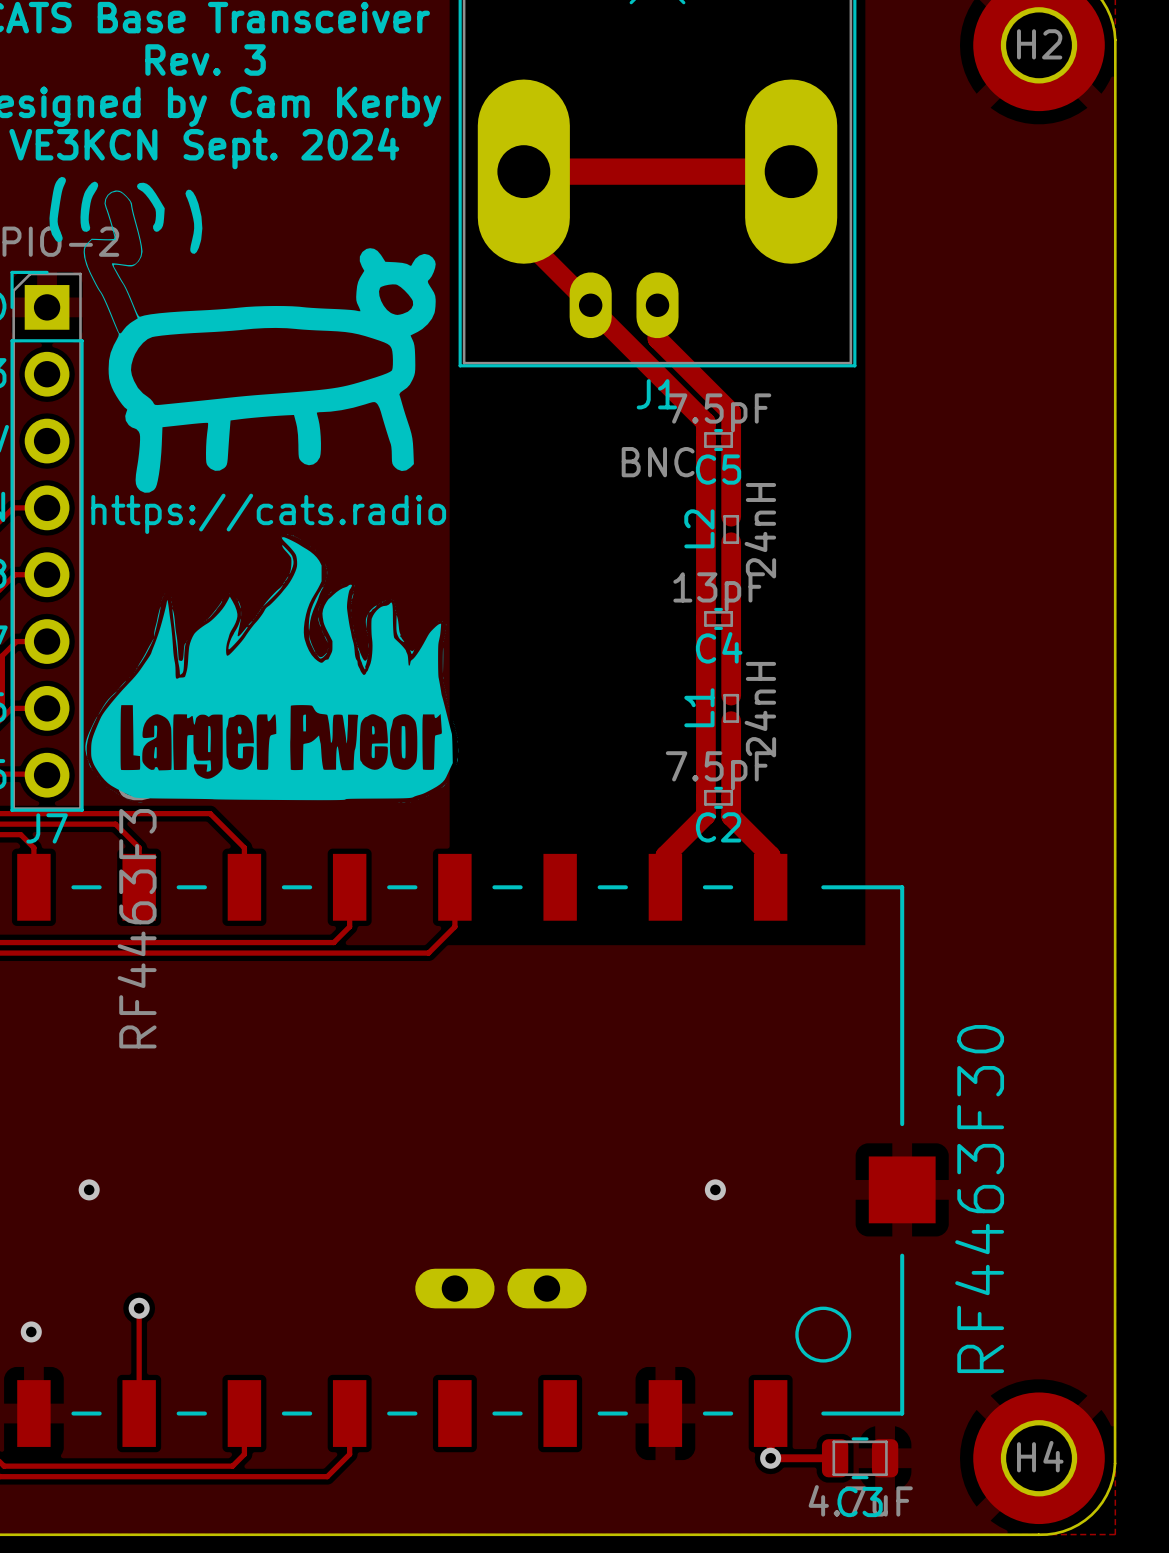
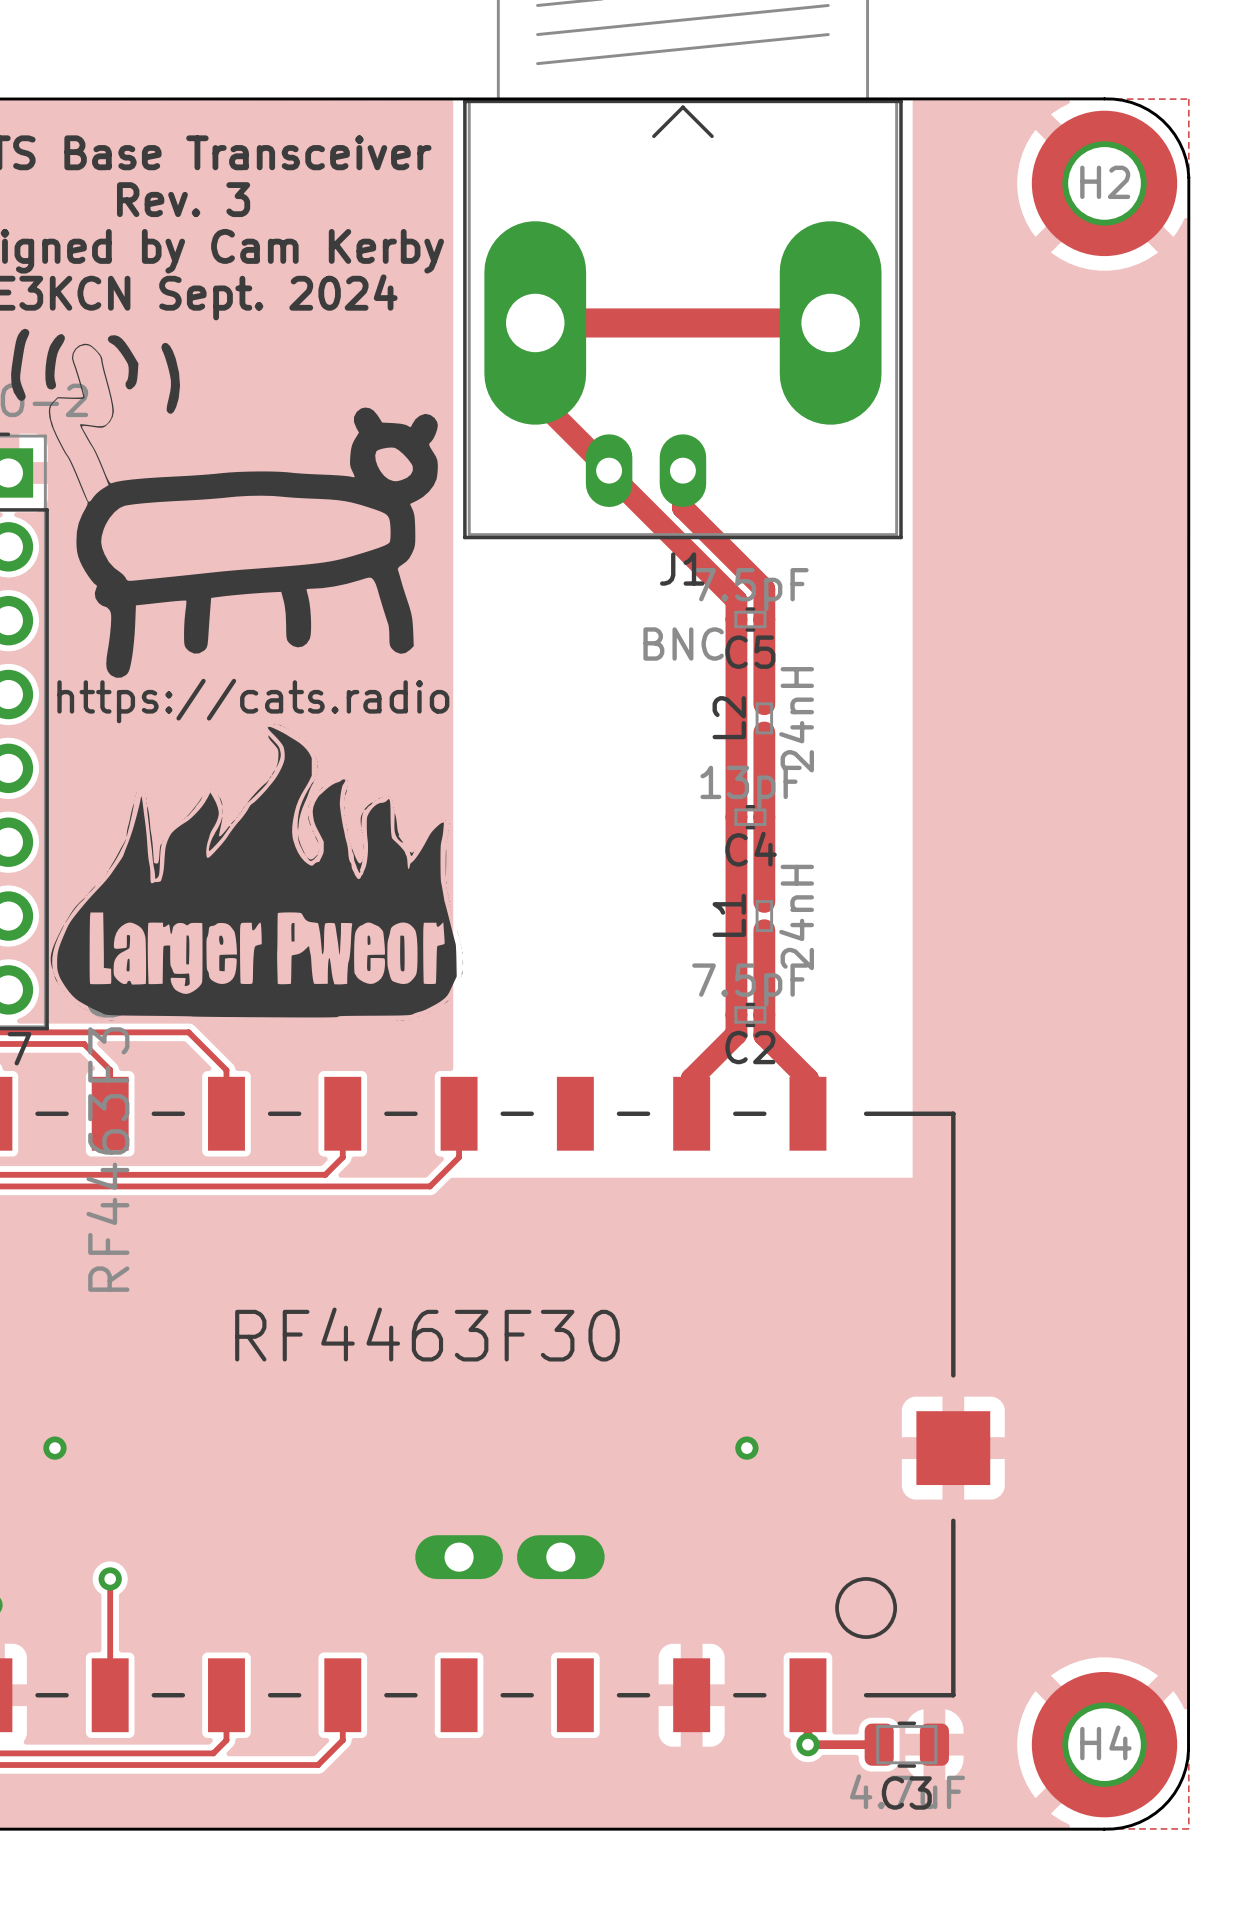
part text rotation: 0° (979, 1199) -> 90° clockwise (427, 1334)
part text position: RF4463F30 (979, 1199) -> RF4463F30 (427, 1334)

